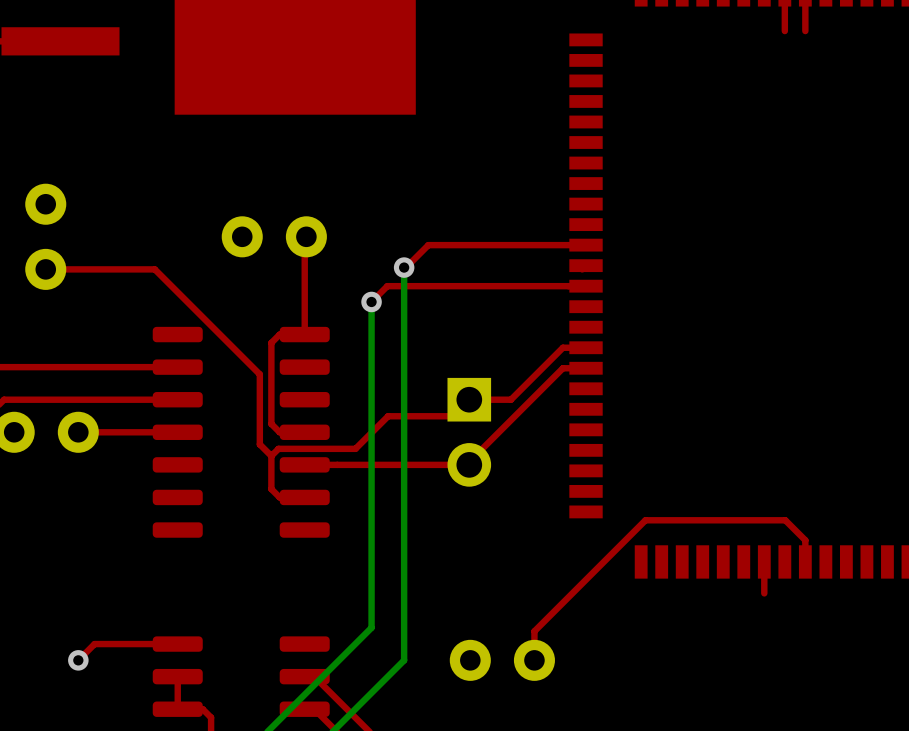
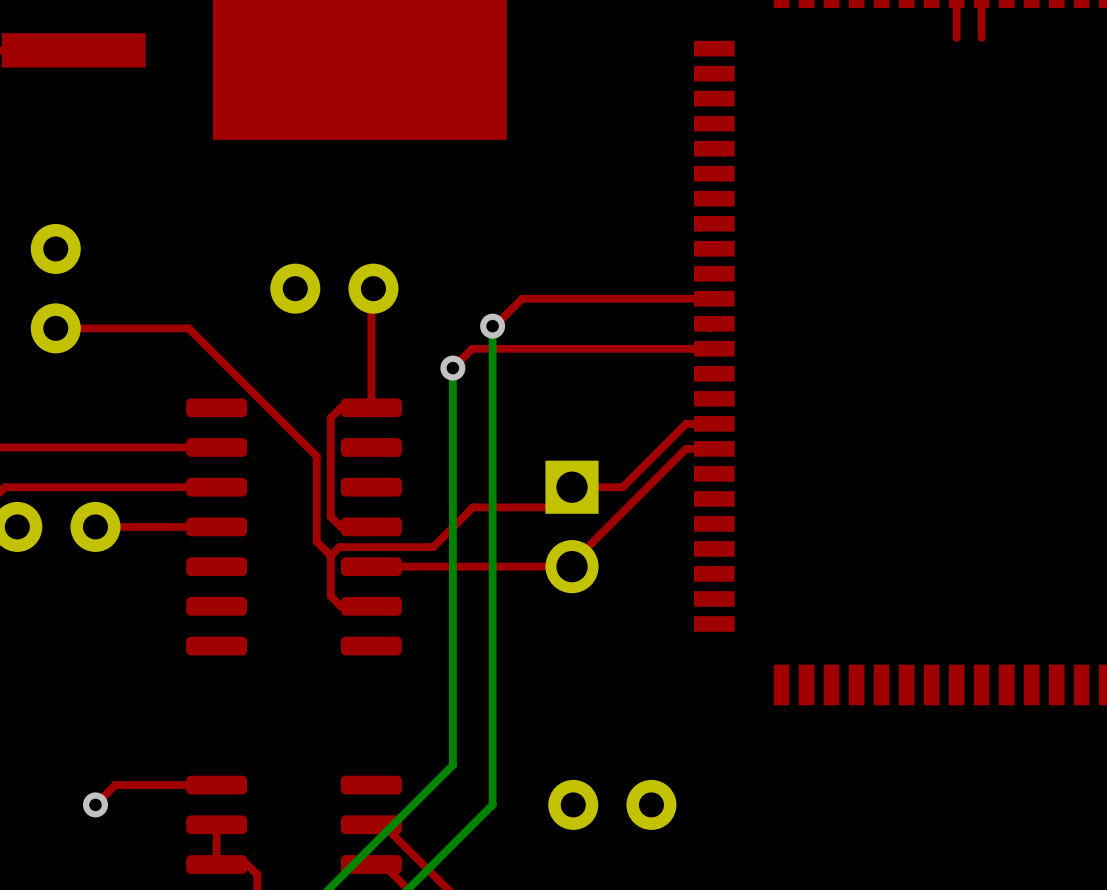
top track: (764, 561) (764, 593) -> none
top track: (805, 561) (805, 540) (785, 520) (645, 520) (534, 631) (534, 660) -> none

